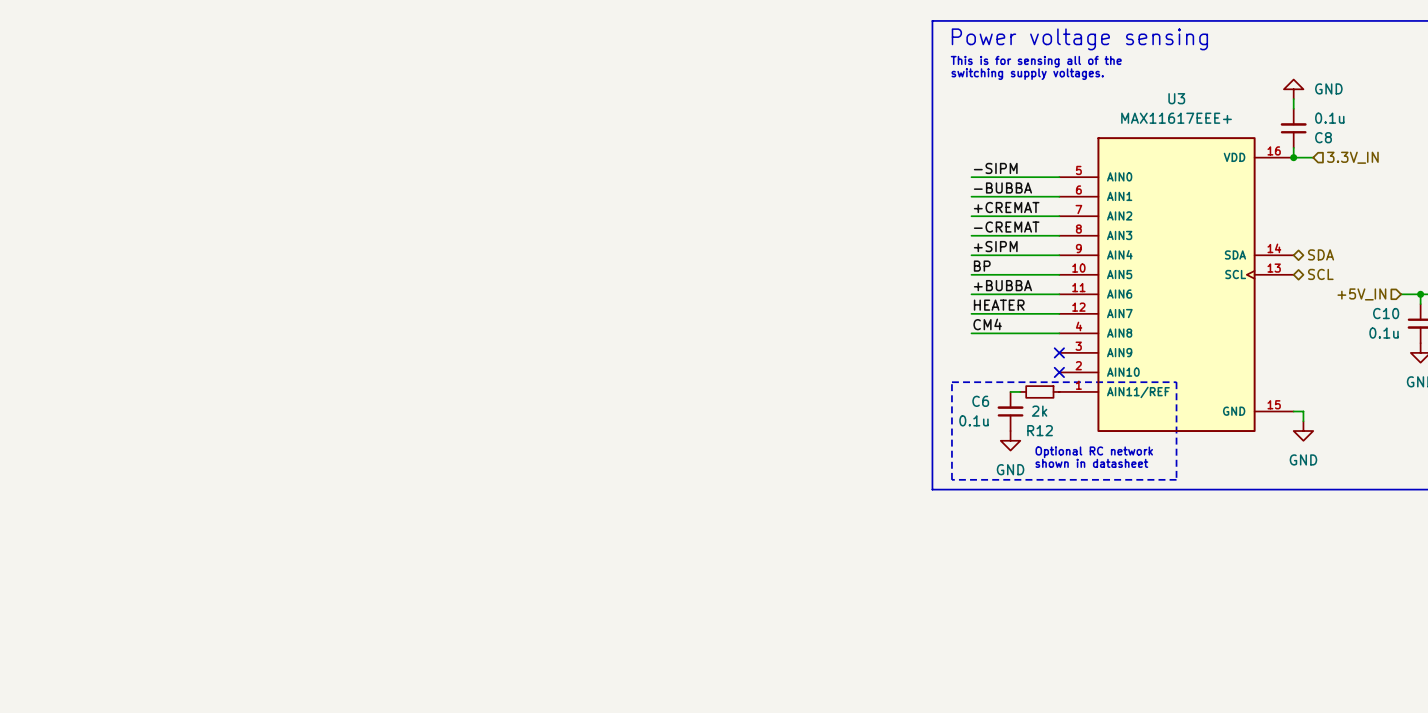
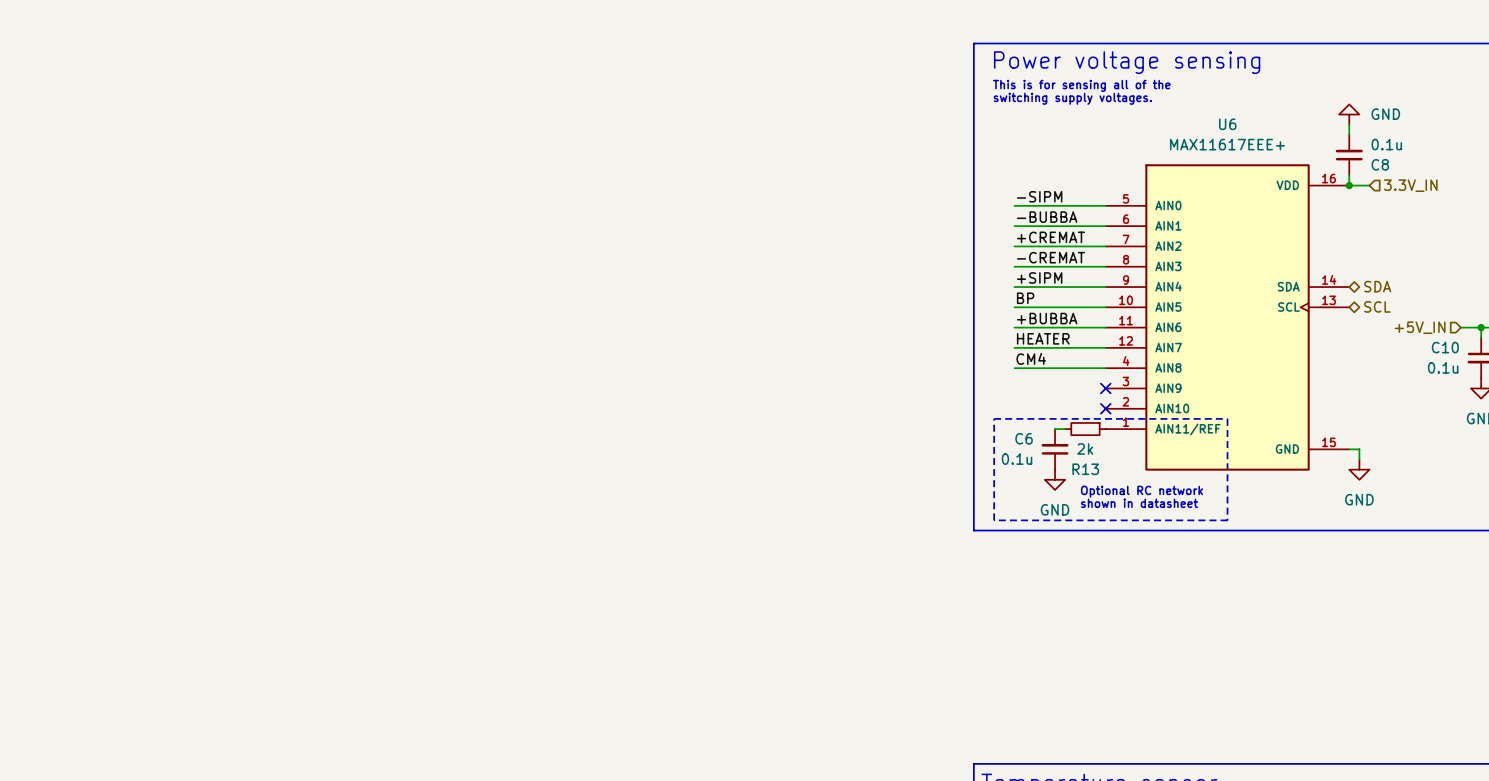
U3 name: U3 (1176, 98) -> U6 (1227, 124)
R12 name: R12 (1040, 430) -> R13 (1085, 469)

